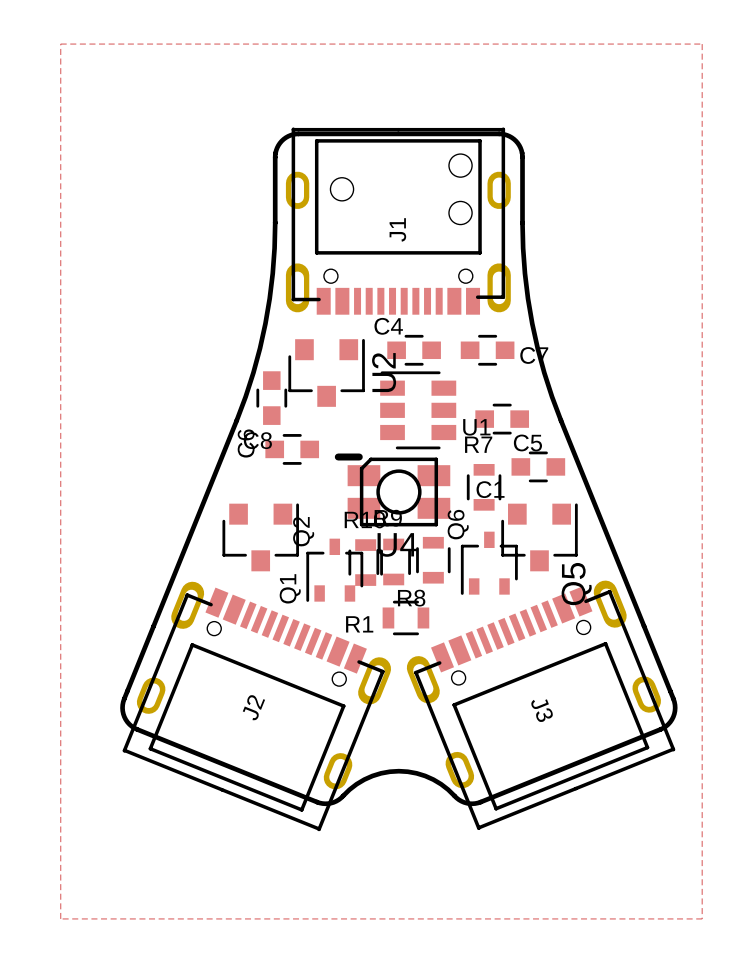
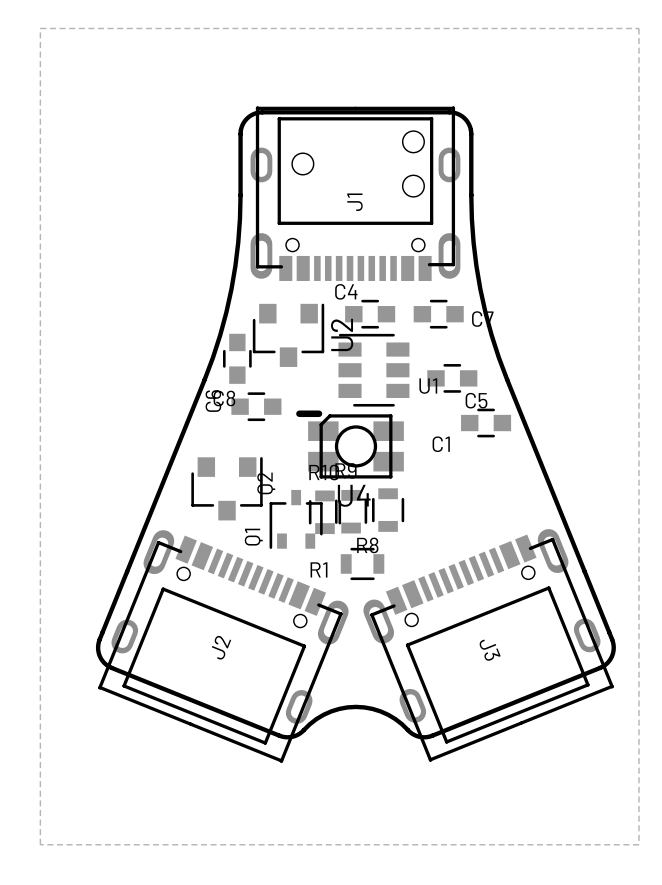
R7: (484, 487) -> none
Q5: (539, 537) -> none
Q6: (489, 563) -> none

